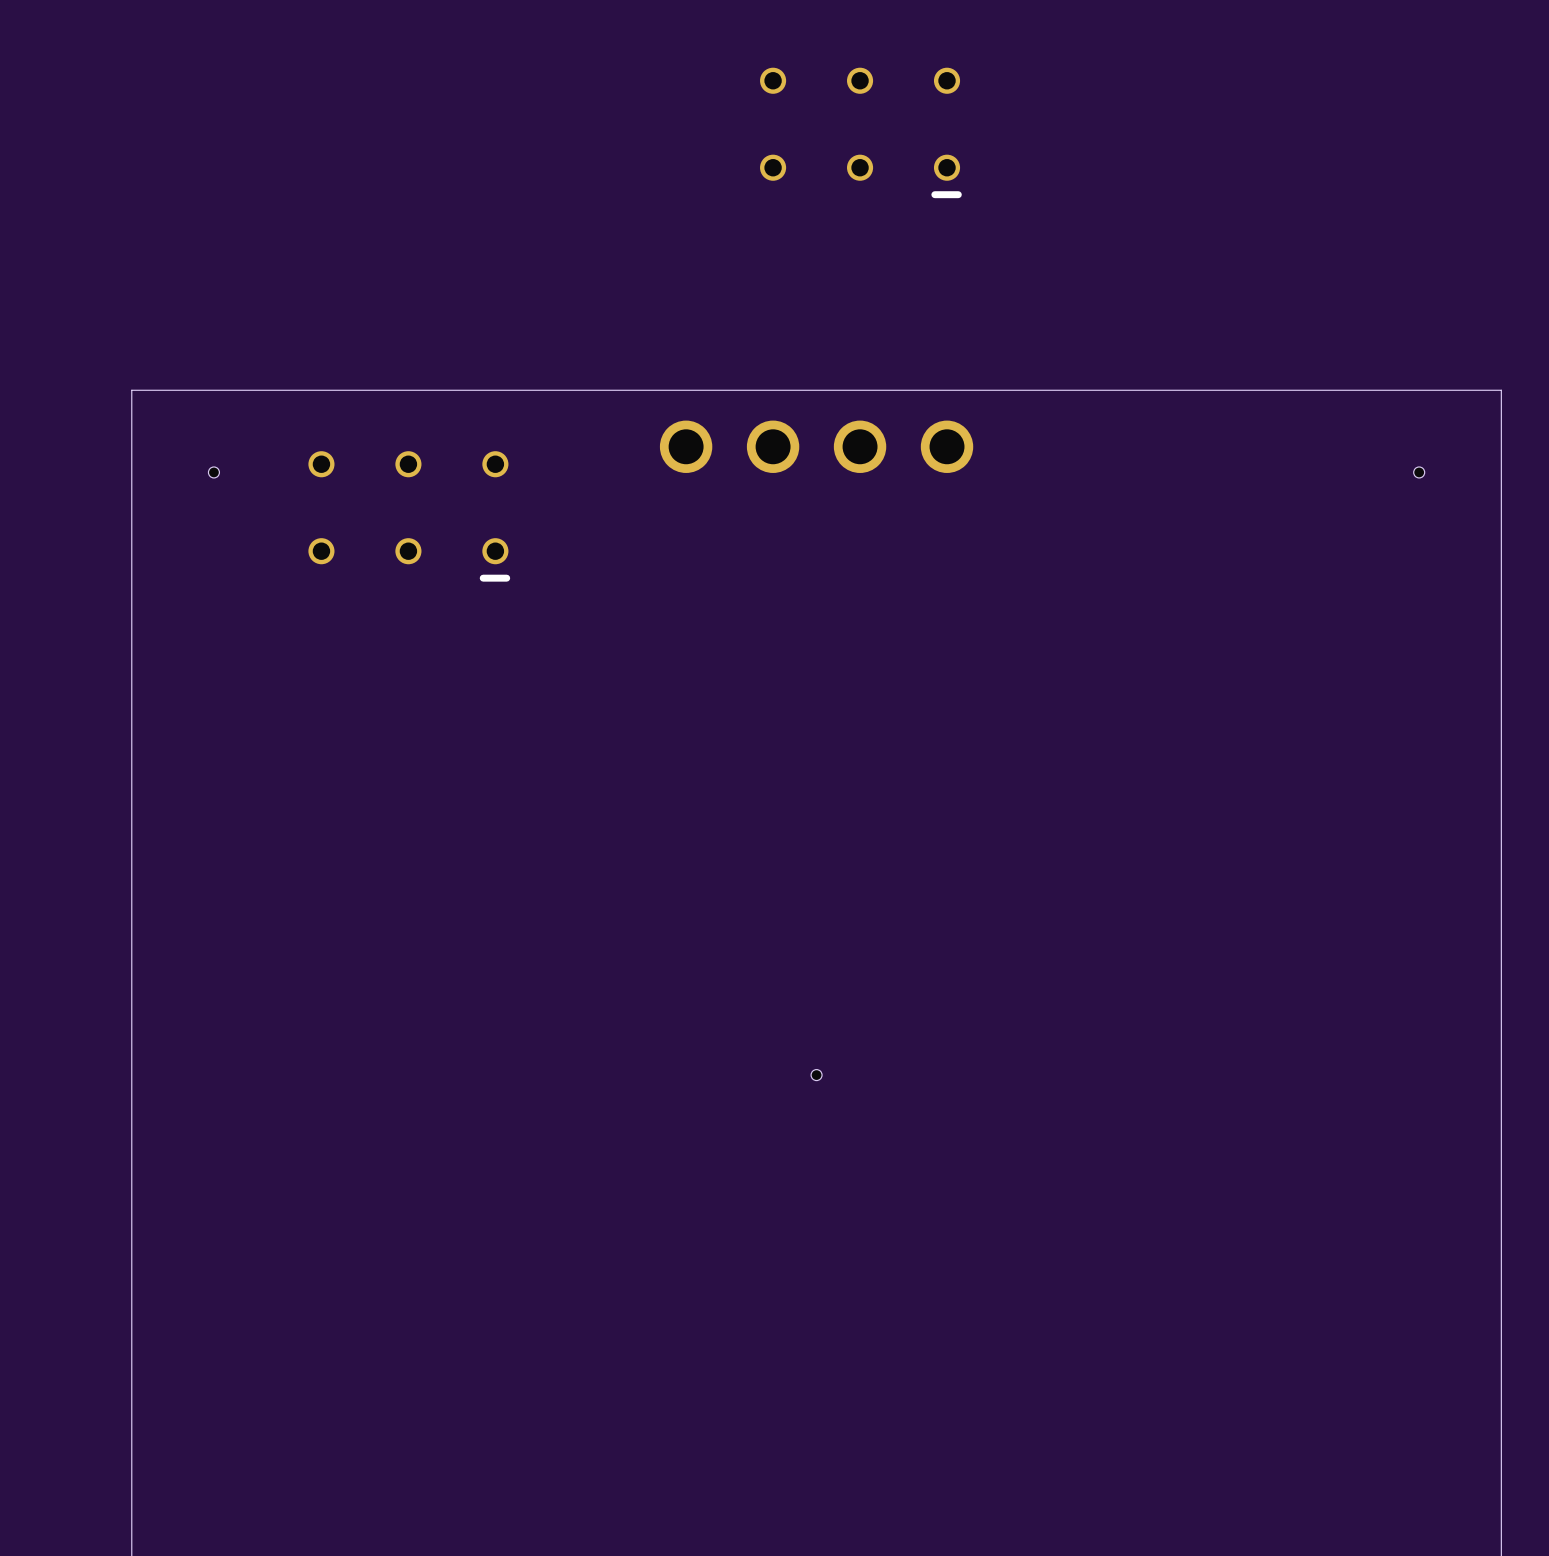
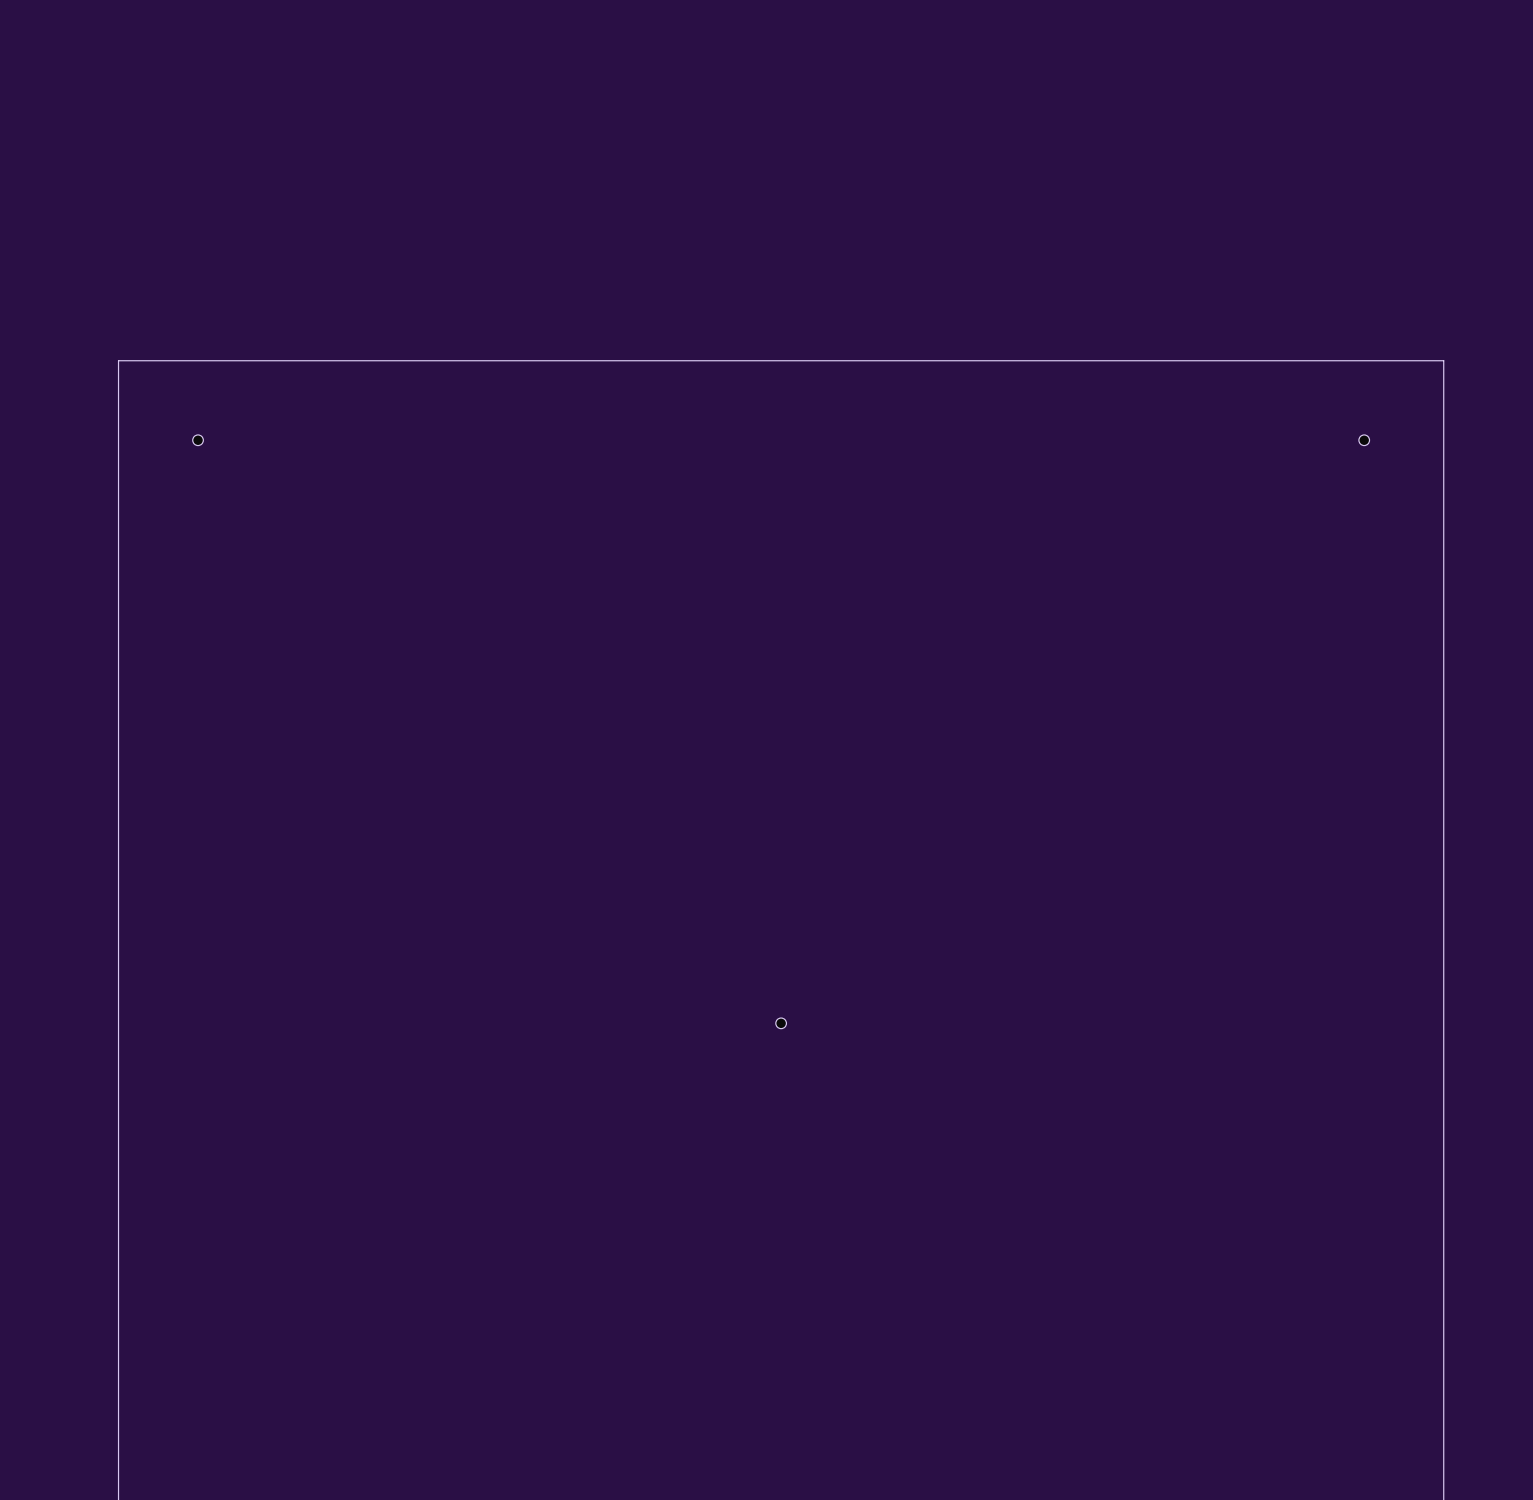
part: (860, 132) -> none
part: (816, 446) -> none
part: (409, 516) -> none

